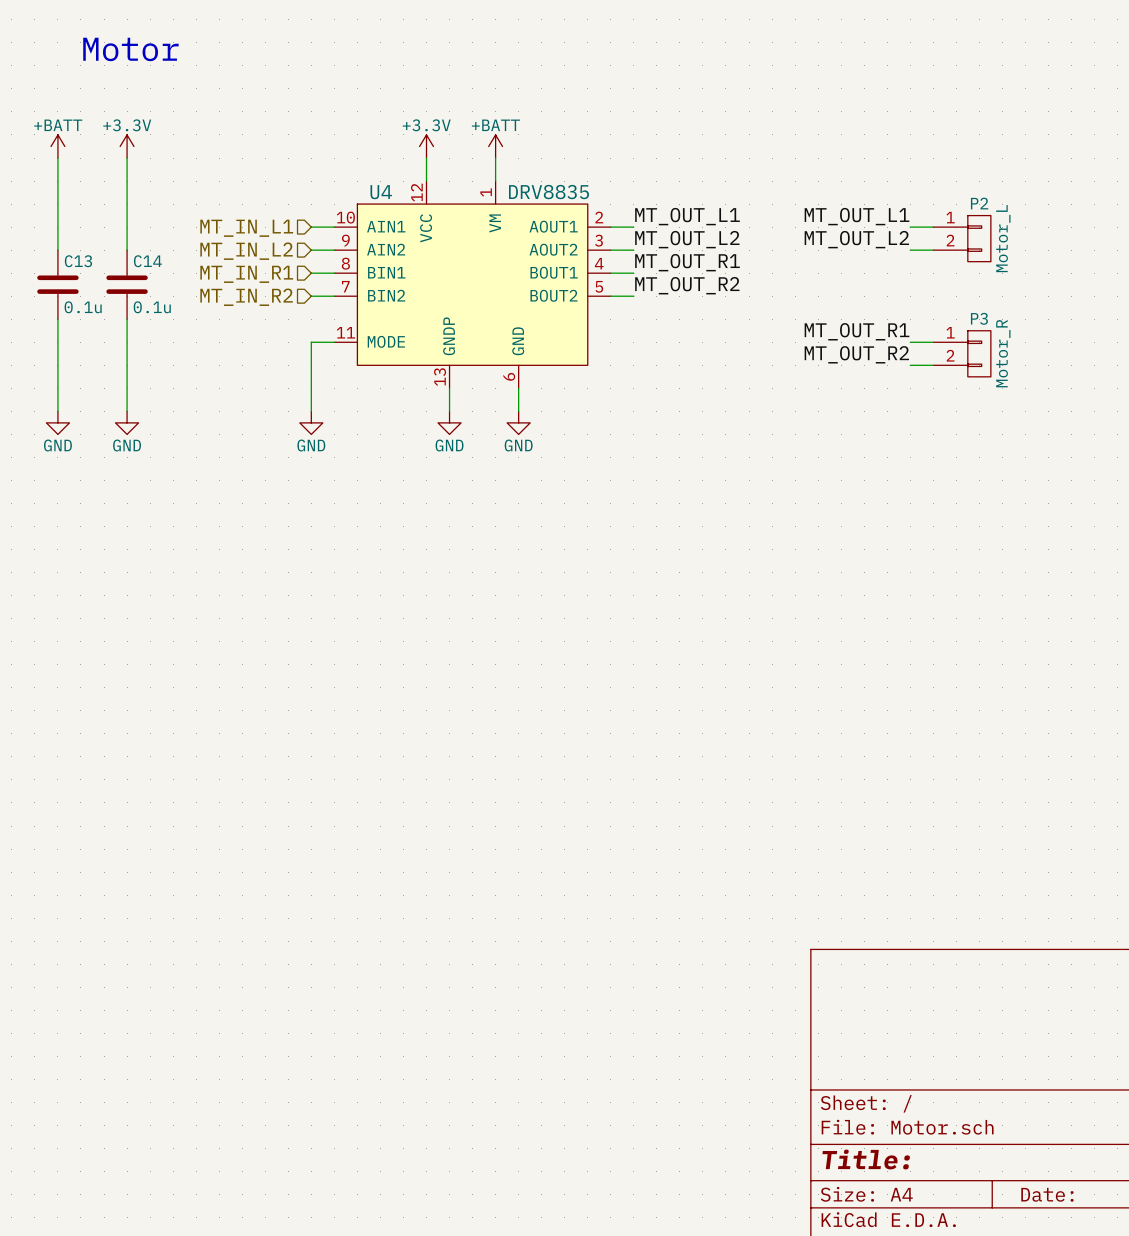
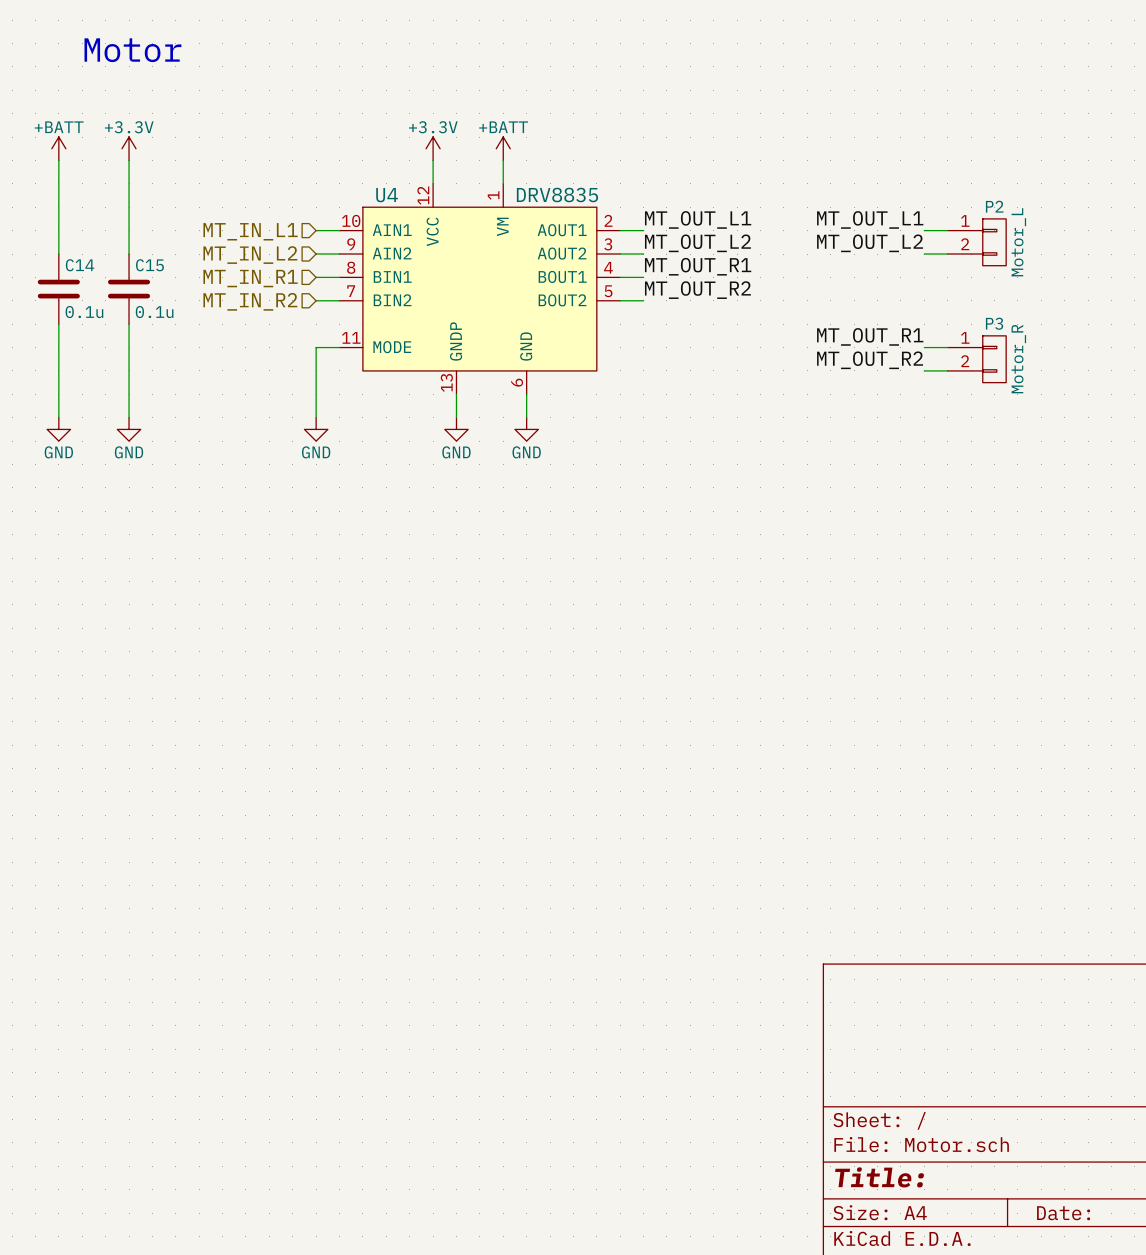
C13 name: C13 (78, 261) -> C14 (80, 265)
C14 name: C14 (147, 261) -> C15 (149, 265)

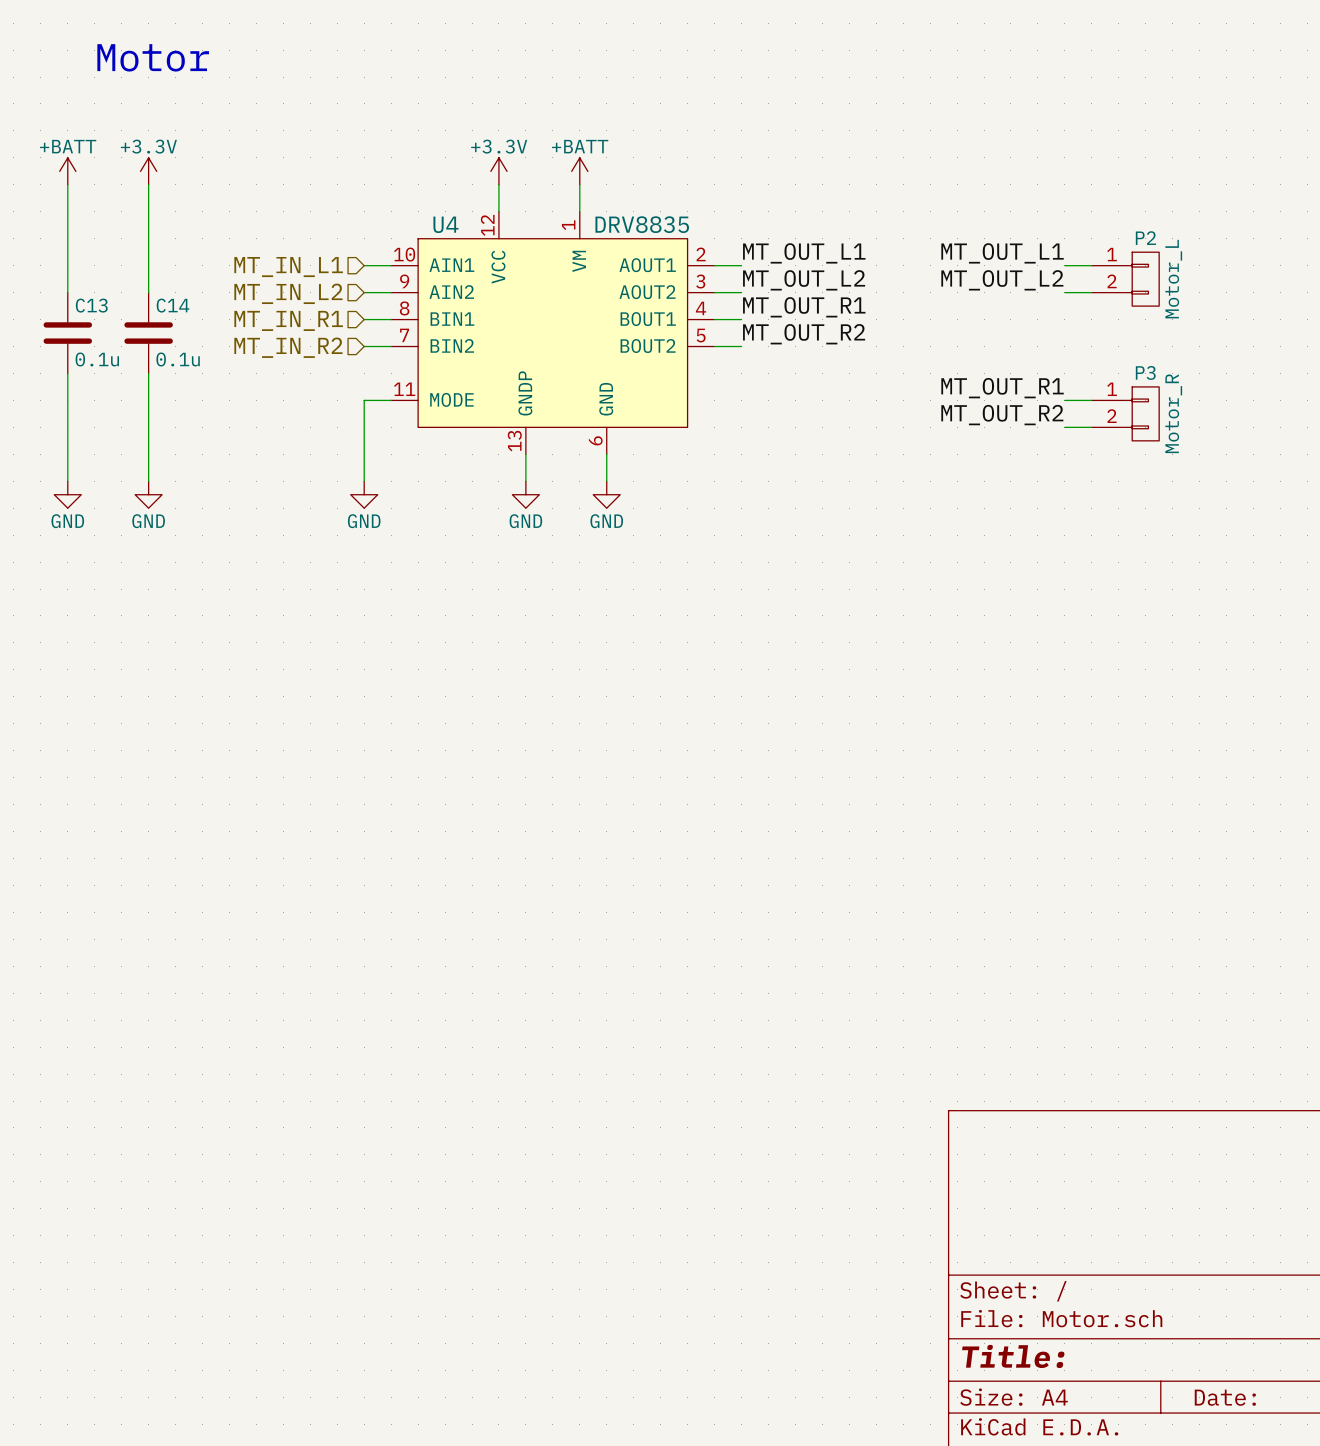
C14 name: C14 (80, 265) -> C13 (91, 305)
C15 name: C15 (149, 265) -> C14 (173, 305)

